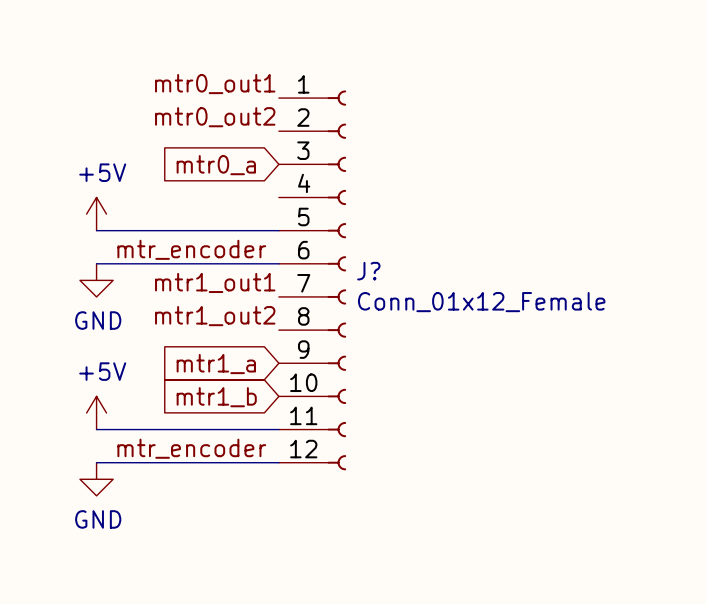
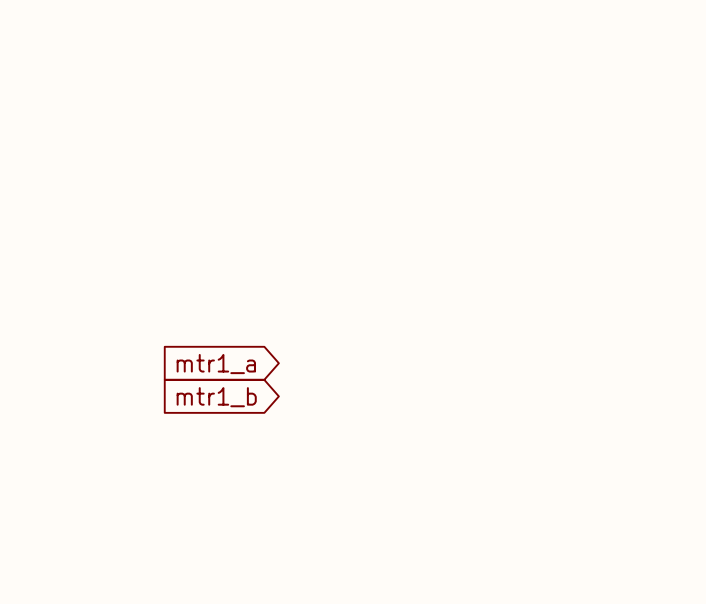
label: mtr0_out1 (215, 84) -> none
label: mtr0_out2 (215, 117) -> none
global label: mtr0_a (216, 165) -> none
power symbol: +5V (96, 214) -> none
wire: (96, 230) (278, 230) -> none
label: mtr_encoder (191, 249) -> none
wire: (96, 263) (278, 263) -> none
power symbol: GND (96, 280) -> none
J?: Conn_01x12_Female (312, 280) -> none
label: mtr1_out1 (215, 282) -> none
label: mtr1_out2 (215, 316) -> none
power symbol: +5V (96, 412) -> none
wire: (96, 429) (278, 429) -> none
label: mtr_encoder (191, 448) -> none
wire: (96, 462) (278, 462) -> none
power symbol: GND (96, 479) -> none

